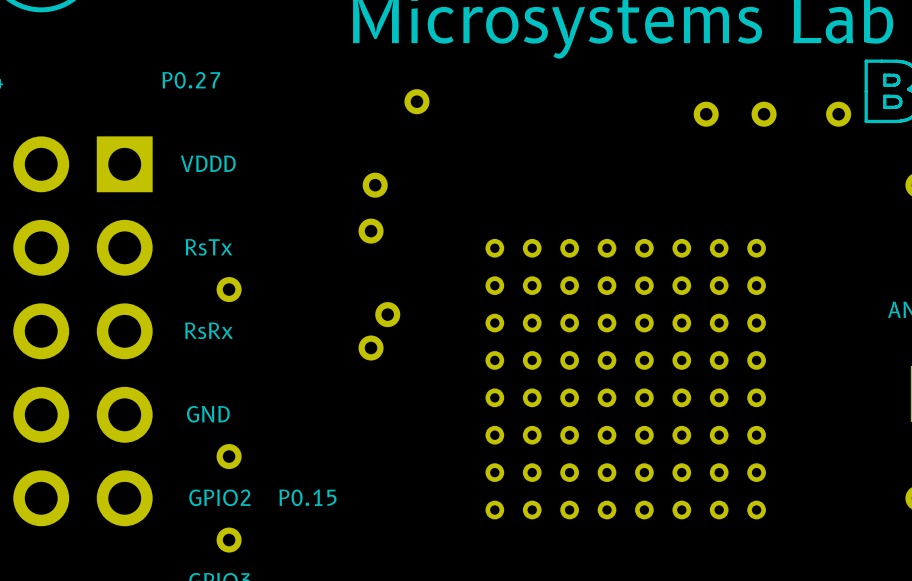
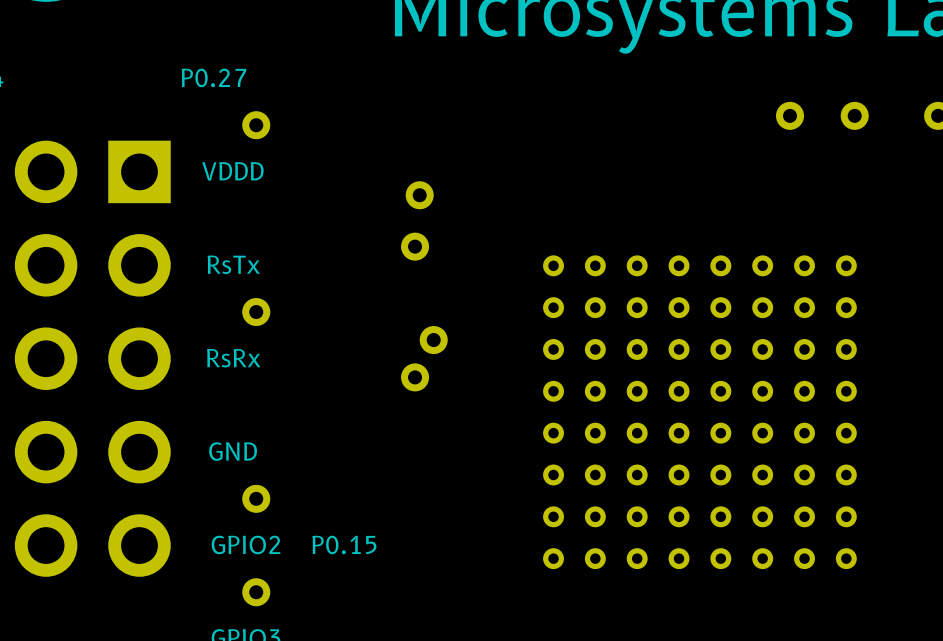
part position: (416, 101) -> (256, 125)

